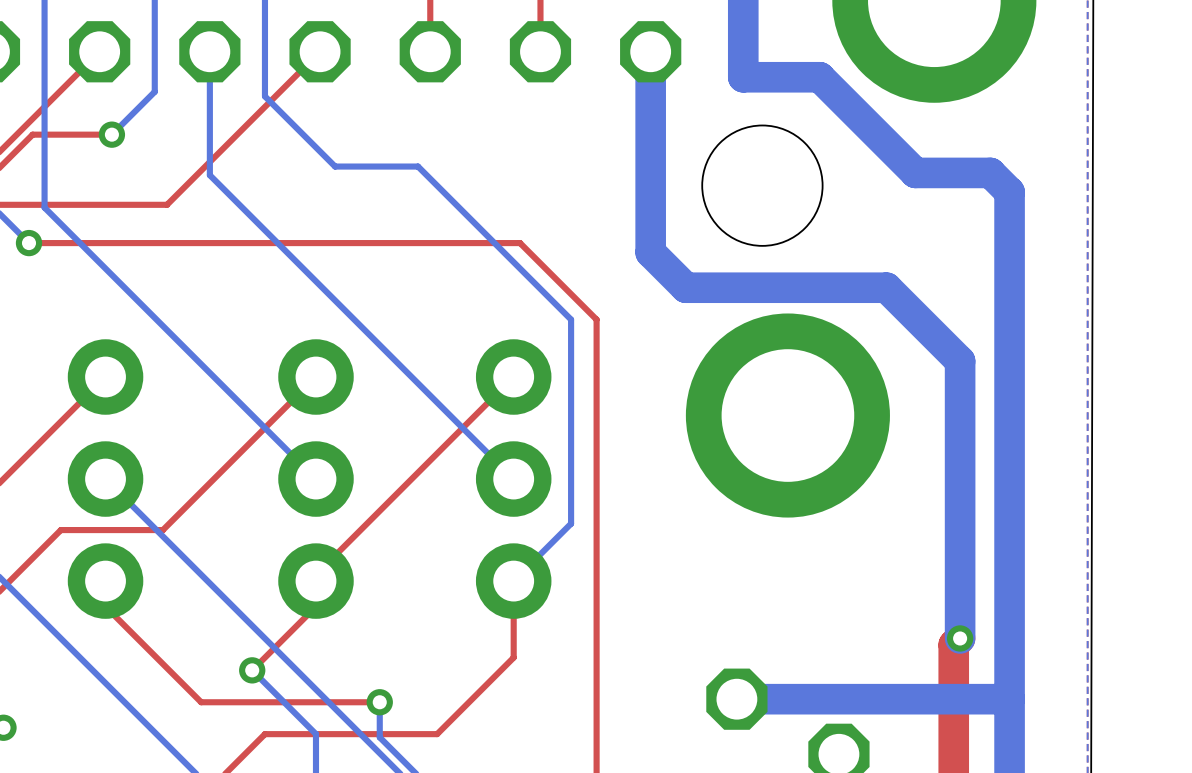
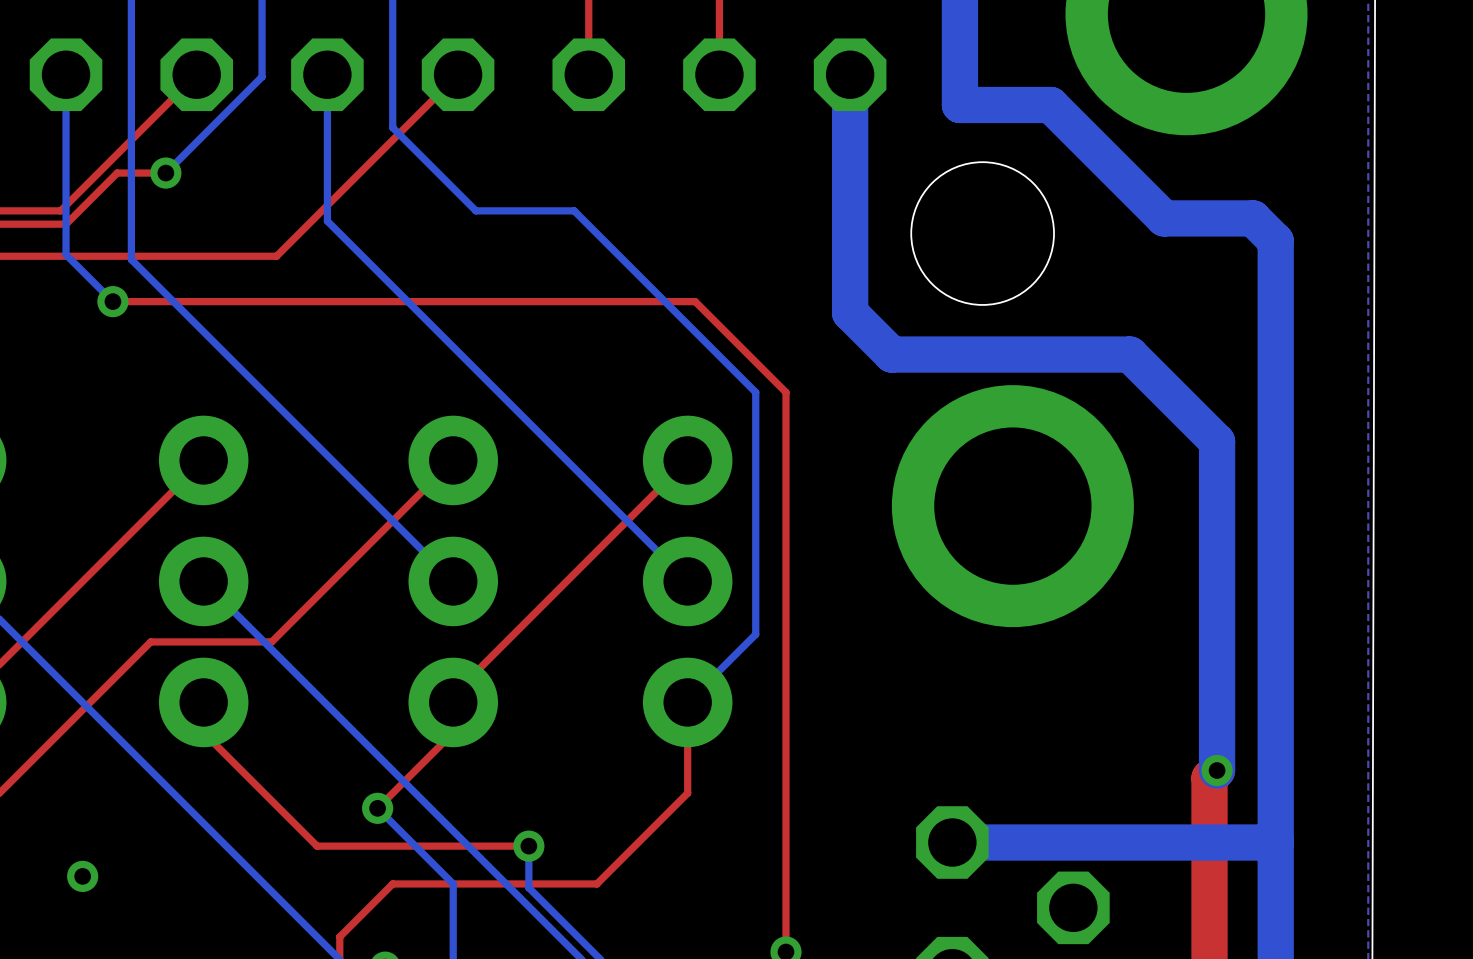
bottom track: (154, 53) (154, 91) (111, 134) -> (262, 76) (165, 173)
top track: (111, 134) (73, 134) -> none
via position: (111, 134) -> (165, 173)

